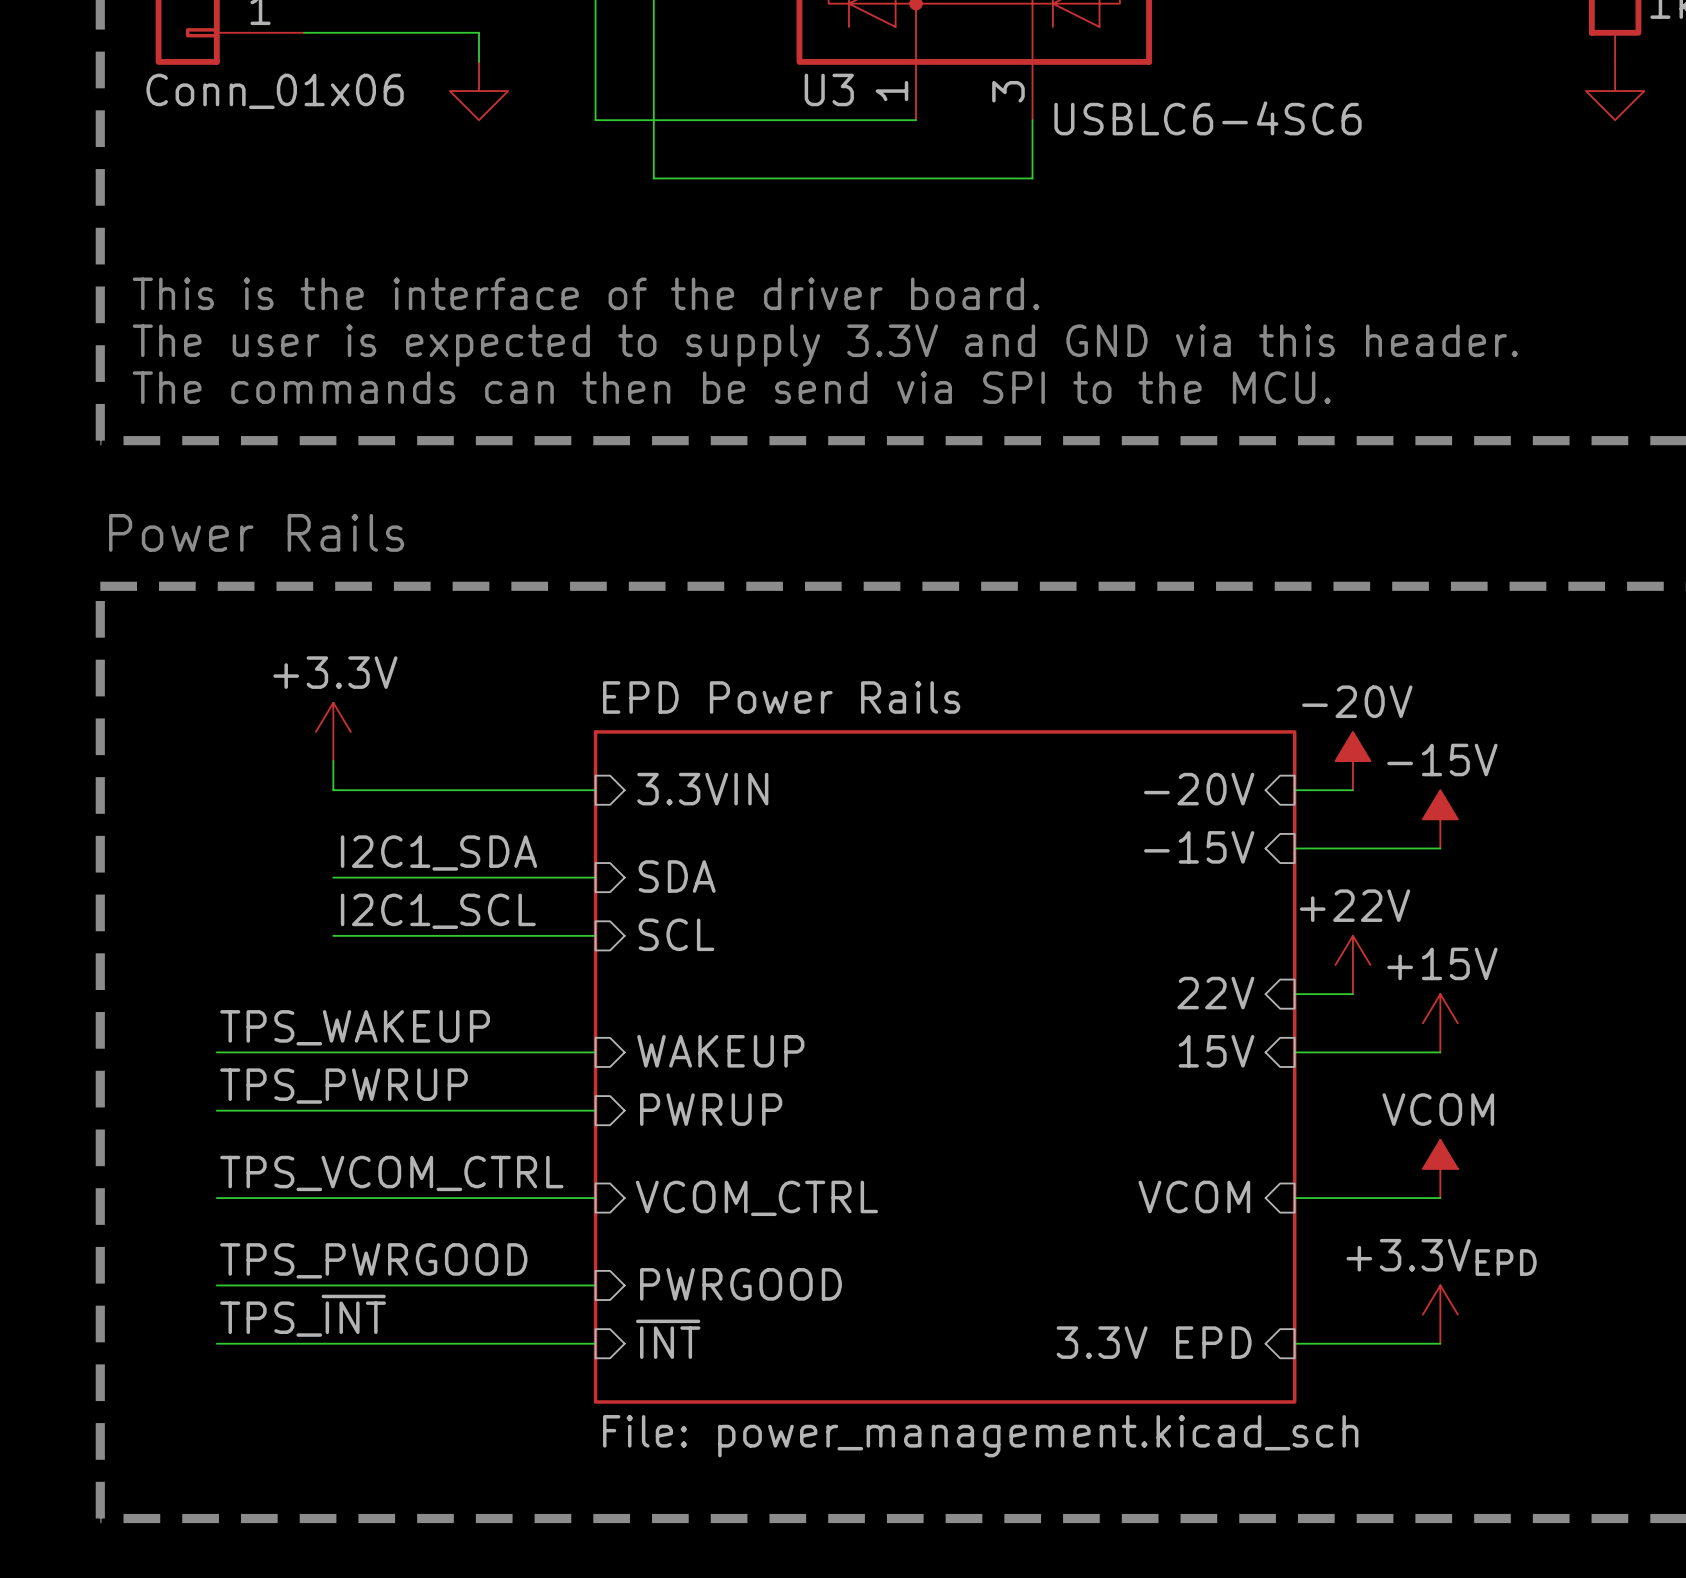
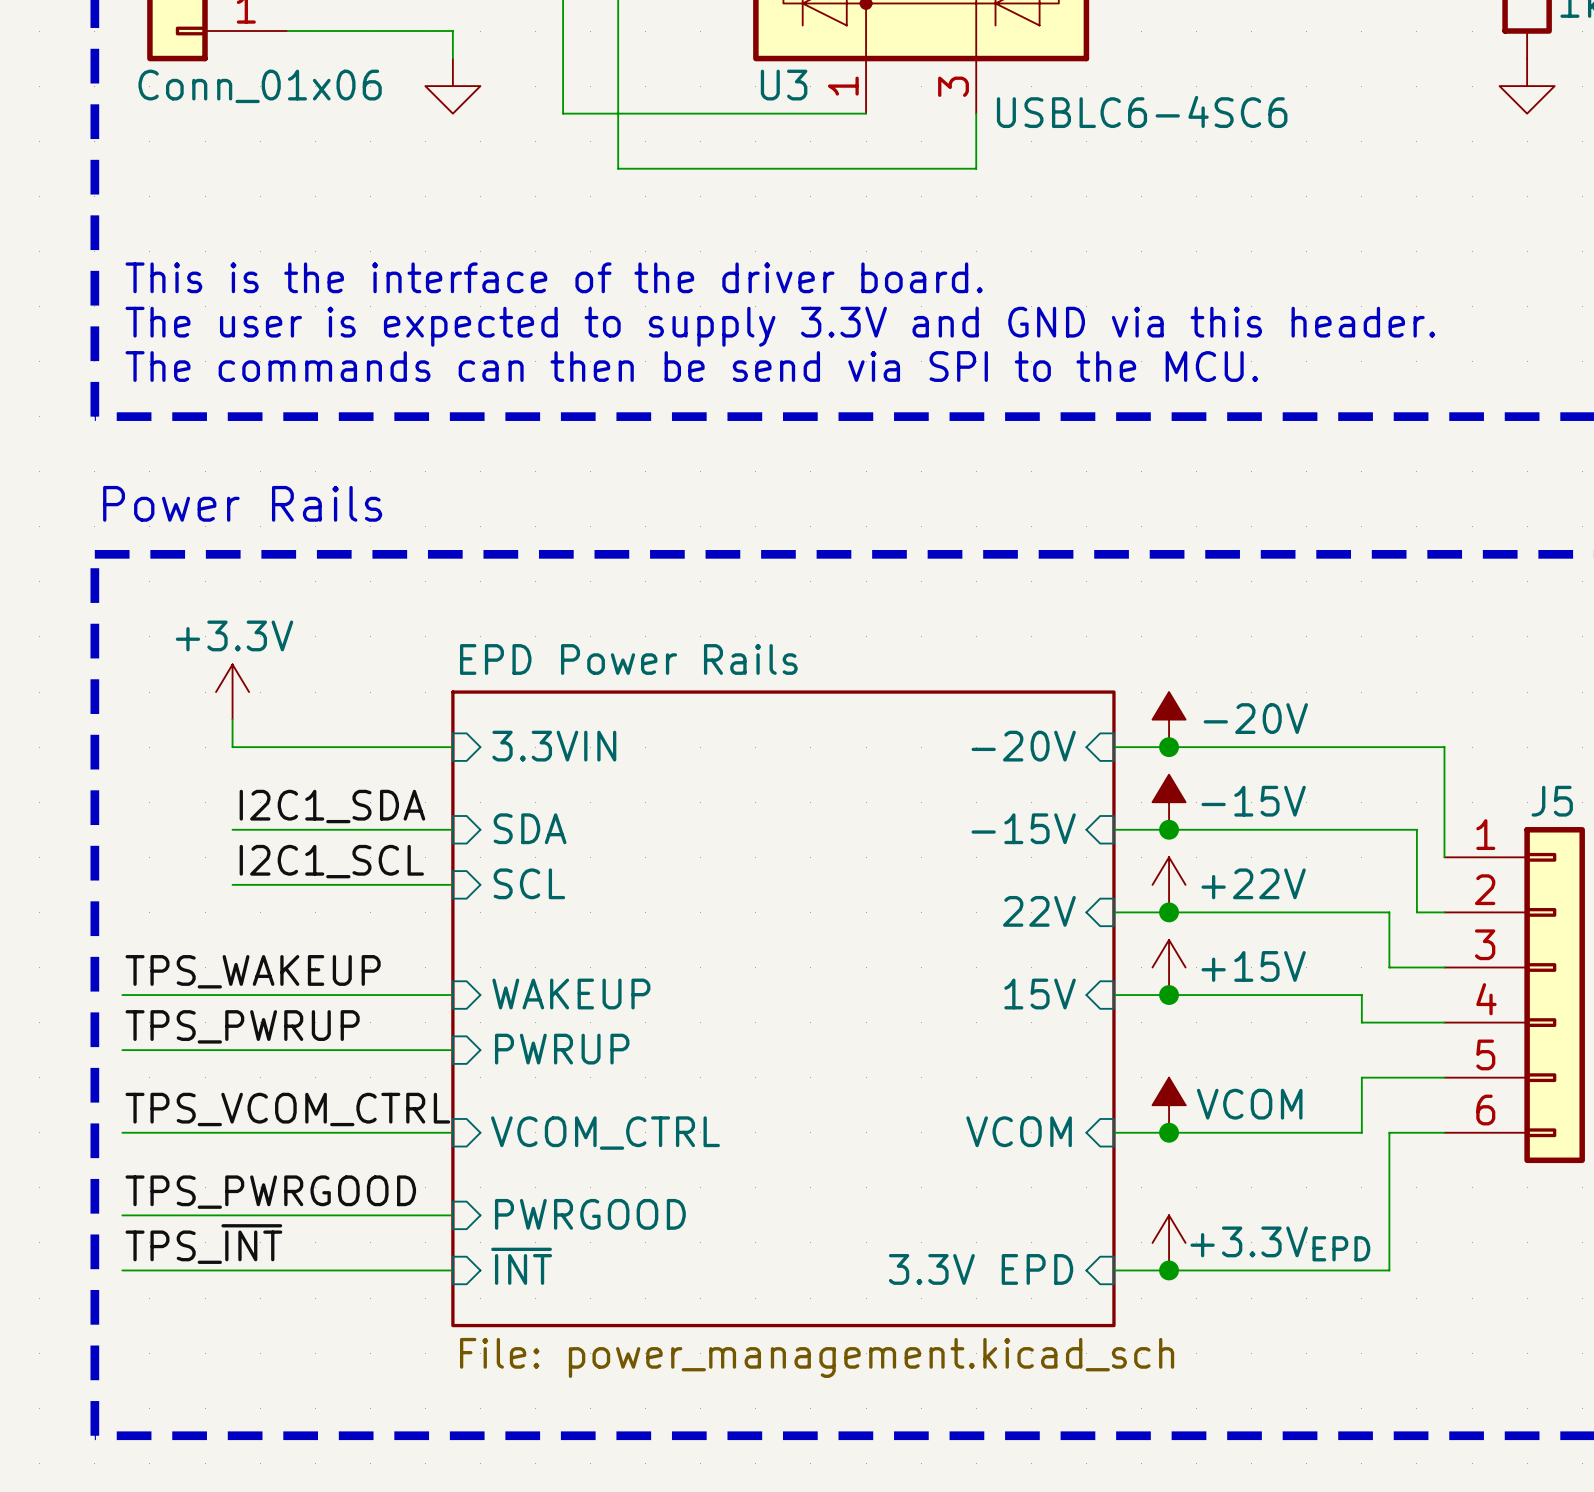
power symbol text position: -20V (1357, 701) -> -20V (1255, 718)
power symbol position: +3.3V (333, 731) -> +3.3V (232, 692)
power symbol text position: -15V (1442, 759) -> -15V (1253, 801)
wire: (333, 761) (333, 790) -> (232, 719) (232, 747) (315, 747)
power symbol position: -20V (1352, 761) -> -20V (1169, 719)
sheet pin position: 3.3VIN (702, 789) -> 3.3VIN (554, 746)
sheet pin position: -20V (1199, 789) -> -20V (1023, 746)
wire: (479, 790) (595, 790) -> none
wire: none -> (1113, 747) (1224, 747)
junction: none -> (1169, 747)
wire: none -> (1279, 747) (1444, 747) (1444, 857)
power symbol position: -15V (1440, 819) -> -15V (1169, 802)
sheet pin position: -15V (1199, 847) -> -15V (1023, 828)
wire: (1294, 848) (1440, 848) -> none
label position: I2C1_SDA (439, 853) -> I2C1_SDA (332, 806)
sheet pin position: SDA (677, 876) -> SDA (530, 828)
wire: none -> (232, 829) (315, 829)
wire: (479, 877) (595, 877) -> none
wire: none -> (1113, 829) (1416, 829) (1416, 912) (1444, 912)
junction: none -> (1169, 829)
power symbol text position: +22V (1355, 905) -> +22V (1253, 883)
label position: I2C1_SCL (438, 911) -> I2C1_SCL (331, 861)
sheet pin position: SCL (676, 934) -> SCL (529, 883)
wire: none -> (232, 884) (315, 884)
wire: (479, 935) (595, 935) -> none
power symbol text position: +15V (1442, 963) -> +15V (1253, 966)
wire: none -> (1113, 912) (1389, 912) (1389, 967) (1444, 967)
junction: none -> (1169, 912)
power symbol position: +22V (1352, 965) -> +22V (1169, 884)
sheet pin position: 22V (1215, 993) -> 22V (1039, 911)
wire: (1294, 994) (1352, 994) -> none
power symbol position: +15V (1440, 1023) -> +15V (1169, 967)
label position: TPS_WAKEUP (355, 1027) -> TPS_WAKEUP (253, 971)
sheet pin position: WAKEUP (720, 1051) -> WAKEUP (571, 994)
sheet pin position: 15V (1216, 1051) -> 15V (1040, 994)
wire: none -> (122, 995) (205, 995)
wire: (479, 1052) (595, 1052) -> none
wire: none -> (1113, 995) (1224, 995)
junction: none -> (1169, 995)
wire: none -> (1361, 995) (1361, 1022) (1444, 1022)
J5: none -> (1514, 995)
sheet EPD Power Rails position: (945, 1066) -> (783, 1008)
label position: TPS_PWRUP (343, 1086) -> TPS_PWRUP (242, 1026)
sheet pin position: PWRUP (711, 1109) -> PWRUP (562, 1049)
power symbol text position: VCOM (1438, 1109) -> VCOM (1249, 1104)
wire: none -> (122, 1050) (205, 1050)
wire: (479, 1110) (595, 1110) -> none
wire: none -> (1444, 1077) (1361, 1077) (1361, 1132)
power symbol position: VCOM (1440, 1168) -> VCOM (1169, 1105)
label position: TPS_VCOM_CTRL (391, 1173) -> TPS_VCOM_CTRL (287, 1109)
sheet pin position: VCOM (1194, 1196) -> VCOM (1019, 1131)
wire: none -> (122, 1132) (205, 1132)
wire: (479, 1198) (595, 1198) -> none
sheet pin position: VCOM_CTRL (756, 1198) -> VCOM_CTRL (605, 1133)
wire: none -> (1113, 1132) (1224, 1132)
junction: none -> (1169, 1132)
wire: none -> (1444, 1132) (1389, 1132) (1389, 1270) (1361, 1270)
power symbol text position: +3.3VEPD (1441, 1257) -> +3.3VEPD (1280, 1243)
label position: TPS_PWRGOOD (373, 1260) -> TPS_PWRGOOD (270, 1192)
sheet pin position: PWRGOOD (740, 1284) -> PWRGOOD (590, 1214)
wire: none -> (122, 1215) (205, 1215)
wire: (479, 1285) (595, 1285) -> none
power symbol position: +3.3VEPD (1440, 1314) -> +3.3VEPD (1169, 1242)
label position: TPS_~{INT} (303, 1315) -> TPS_~{INT} (203, 1244)
sheet pin position: ~{INT} (668, 1339) -> ~{INT} (521, 1266)
sheet pin position: 3.3V EPD (1154, 1342) -> 3.3V EPD (981, 1269)
wire: none -> (122, 1270) (205, 1270)
wire: (479, 1343) (595, 1343) -> none
wire: none -> (1113, 1270) (1224, 1270)
junction: none -> (1169, 1270)

